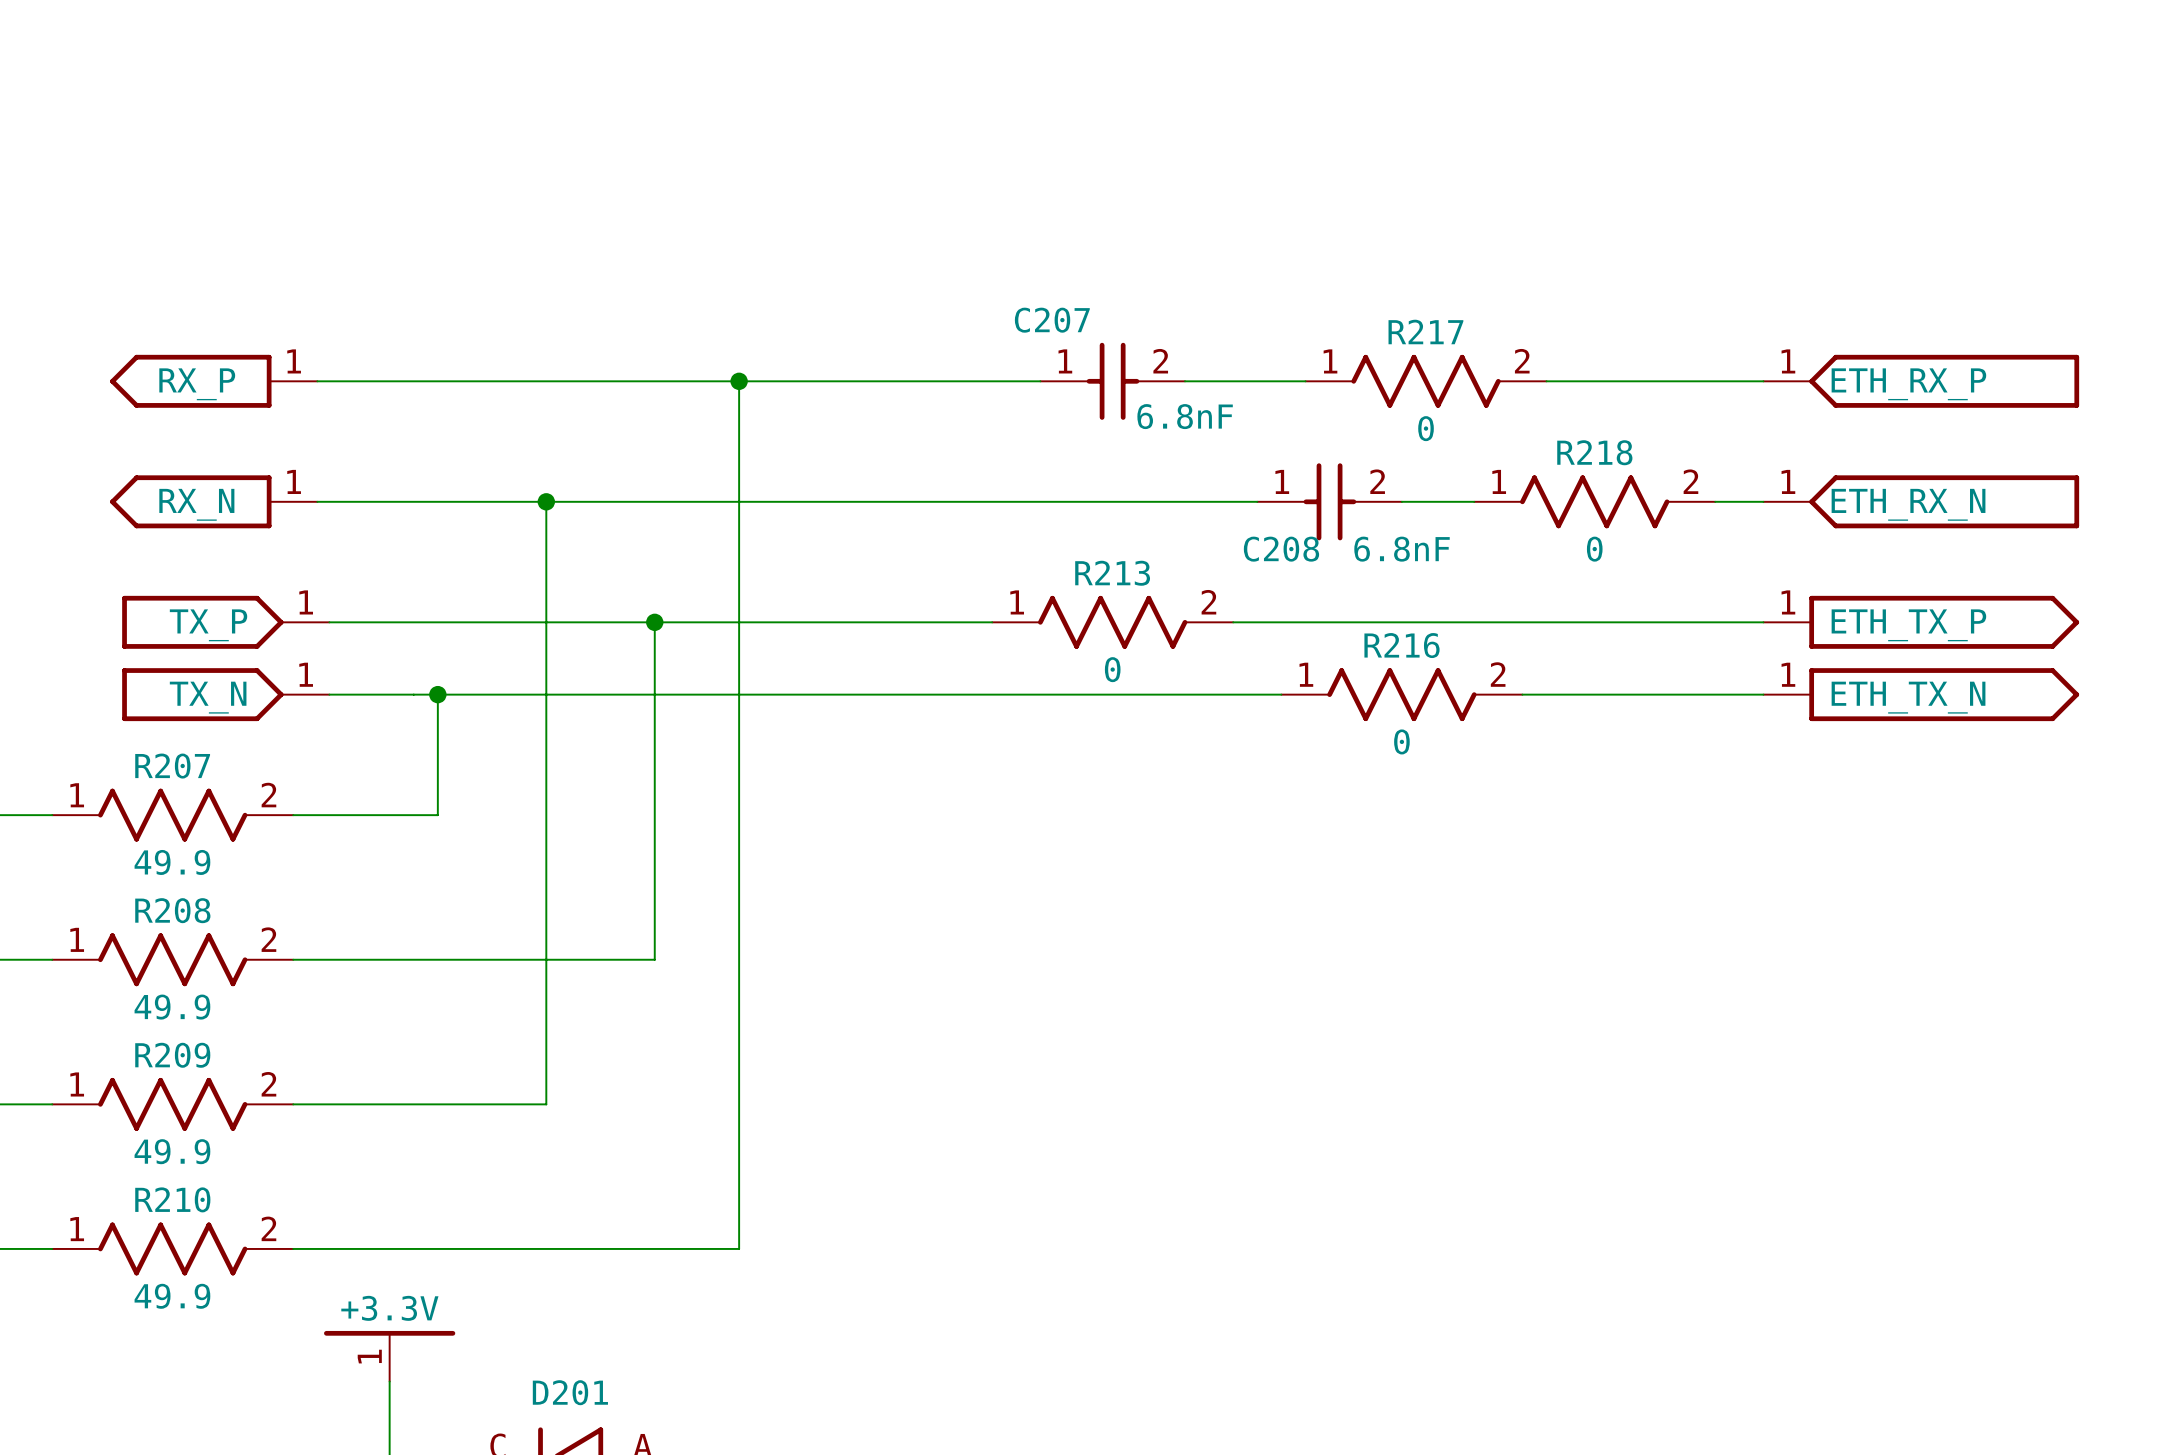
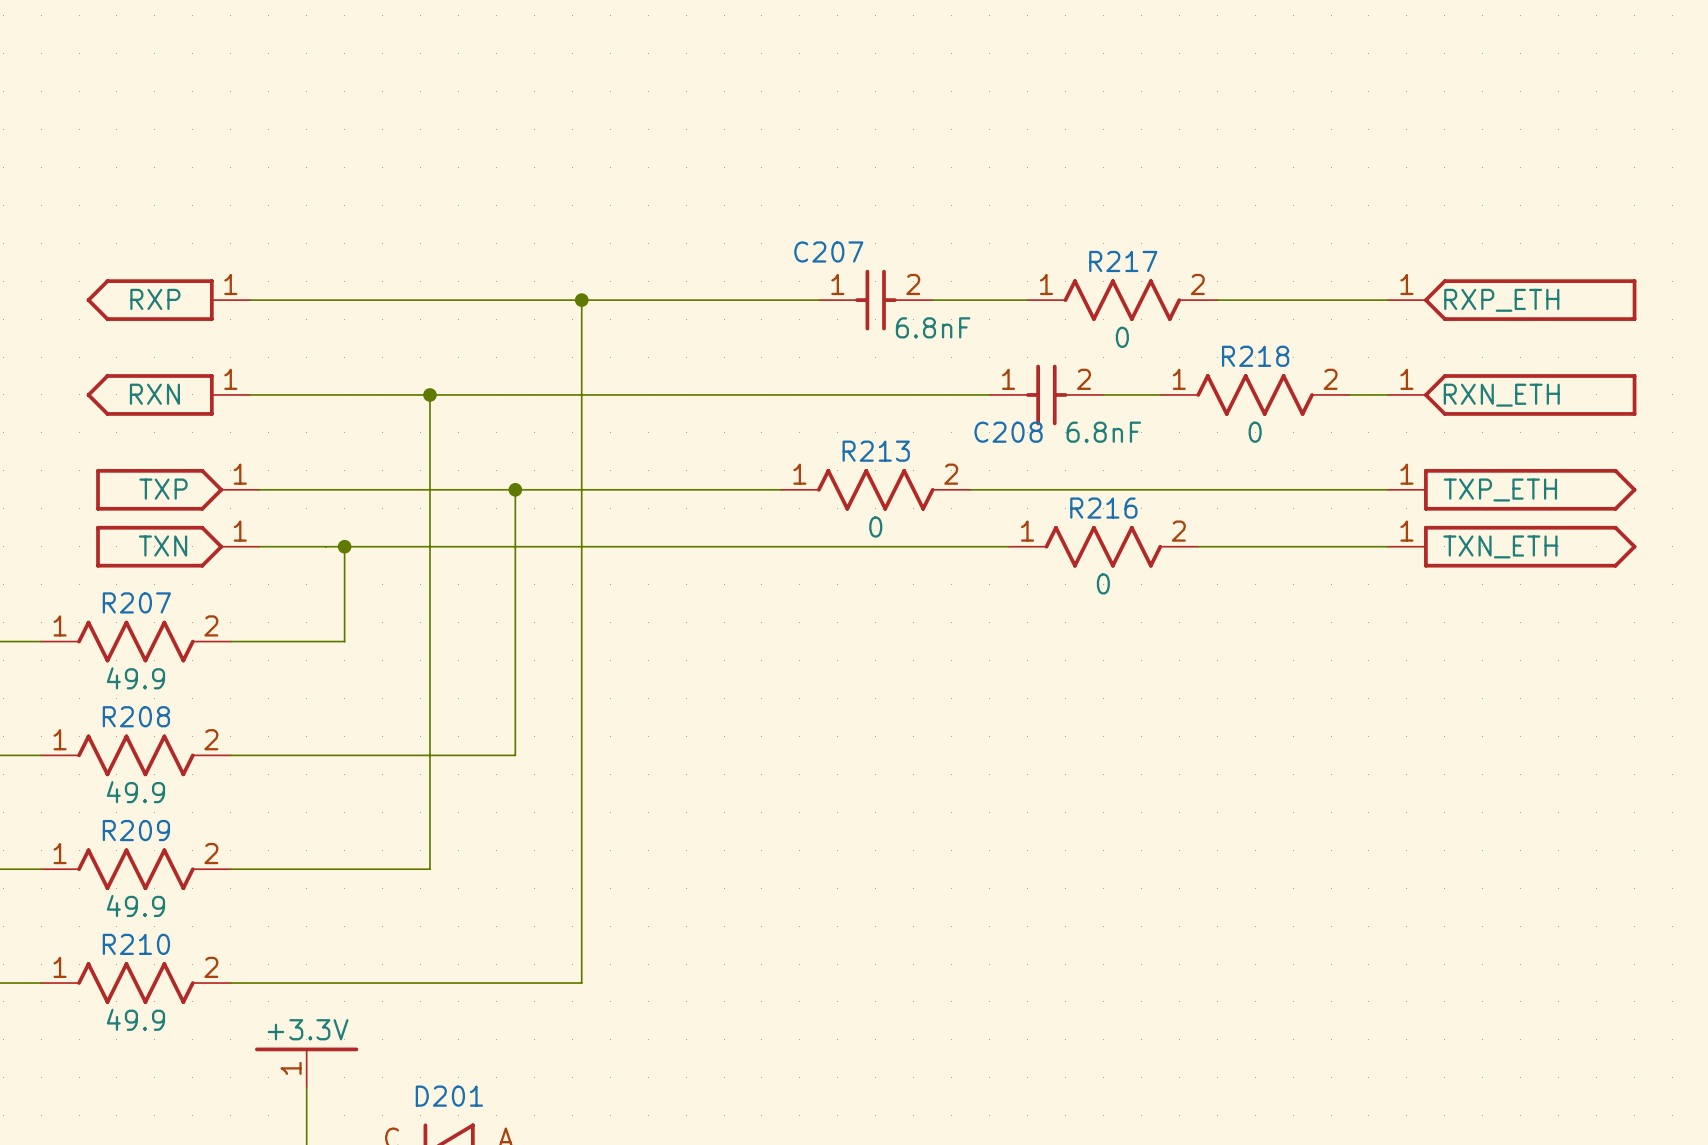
power symbol: RX_P (213, 381) -> RXP (168, 300)
power symbol: ETH_RX_P (1921, 381) -> RXP_ETH (1512, 300)
power symbol: RX_N (213, 501) -> RXN (168, 394)
power symbol: ETH_RX_N (1921, 501) -> RXN_ETH (1512, 394)
power symbol: TX_P (225, 622) -> TXP (177, 489)
power symbol: ETH_TX_P (1921, 622) -> TXP_ETH (1512, 489)
power symbol: TX_N (225, 694) -> TXN (177, 546)
power symbol: ETH_TX_N (1921, 694) -> TXN_ETH (1512, 546)

